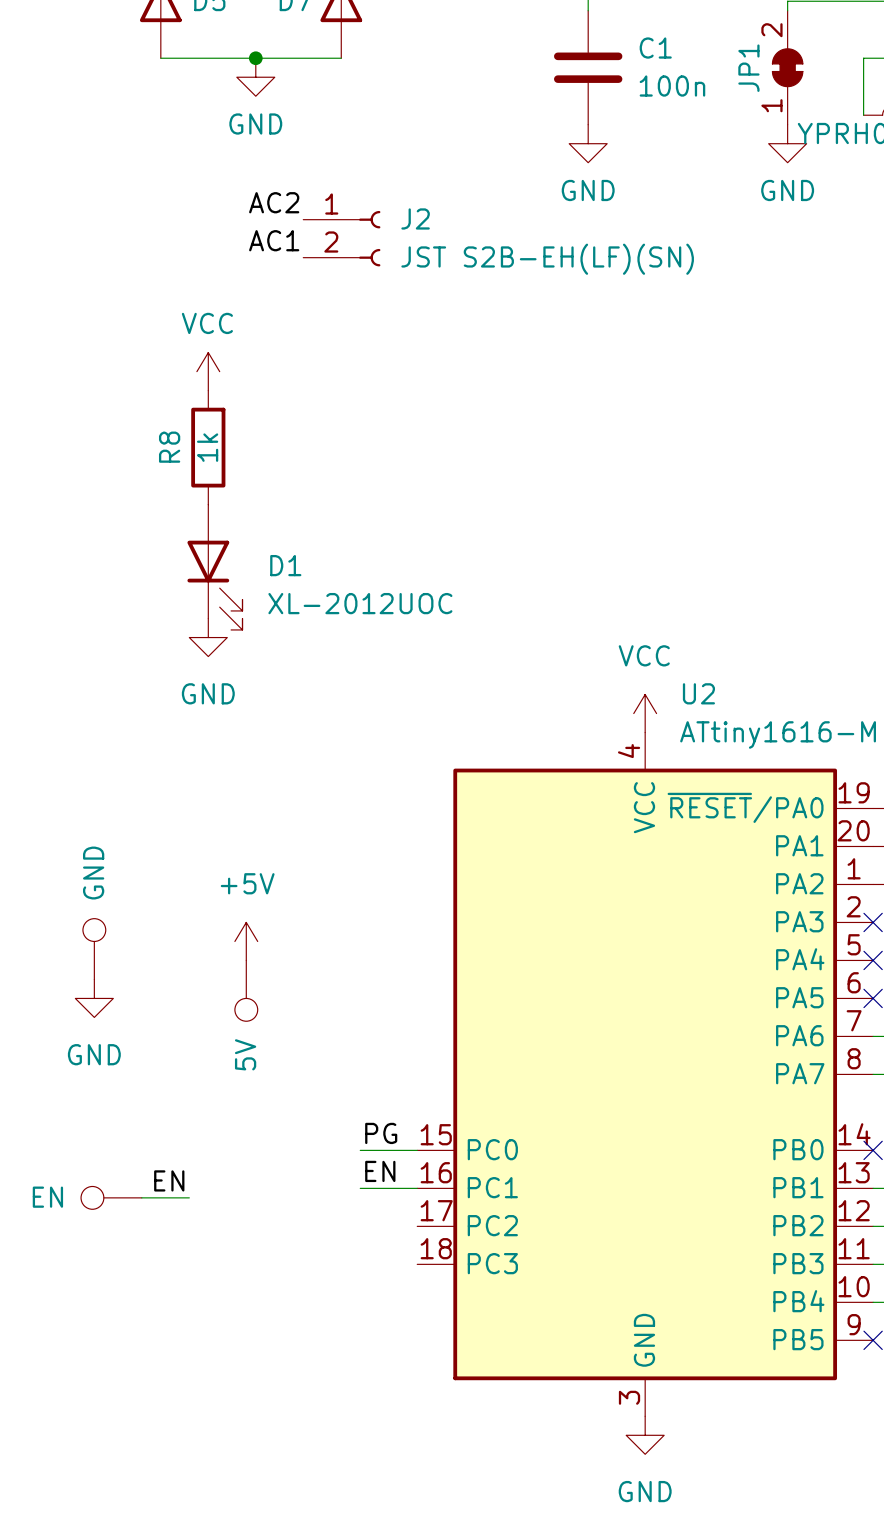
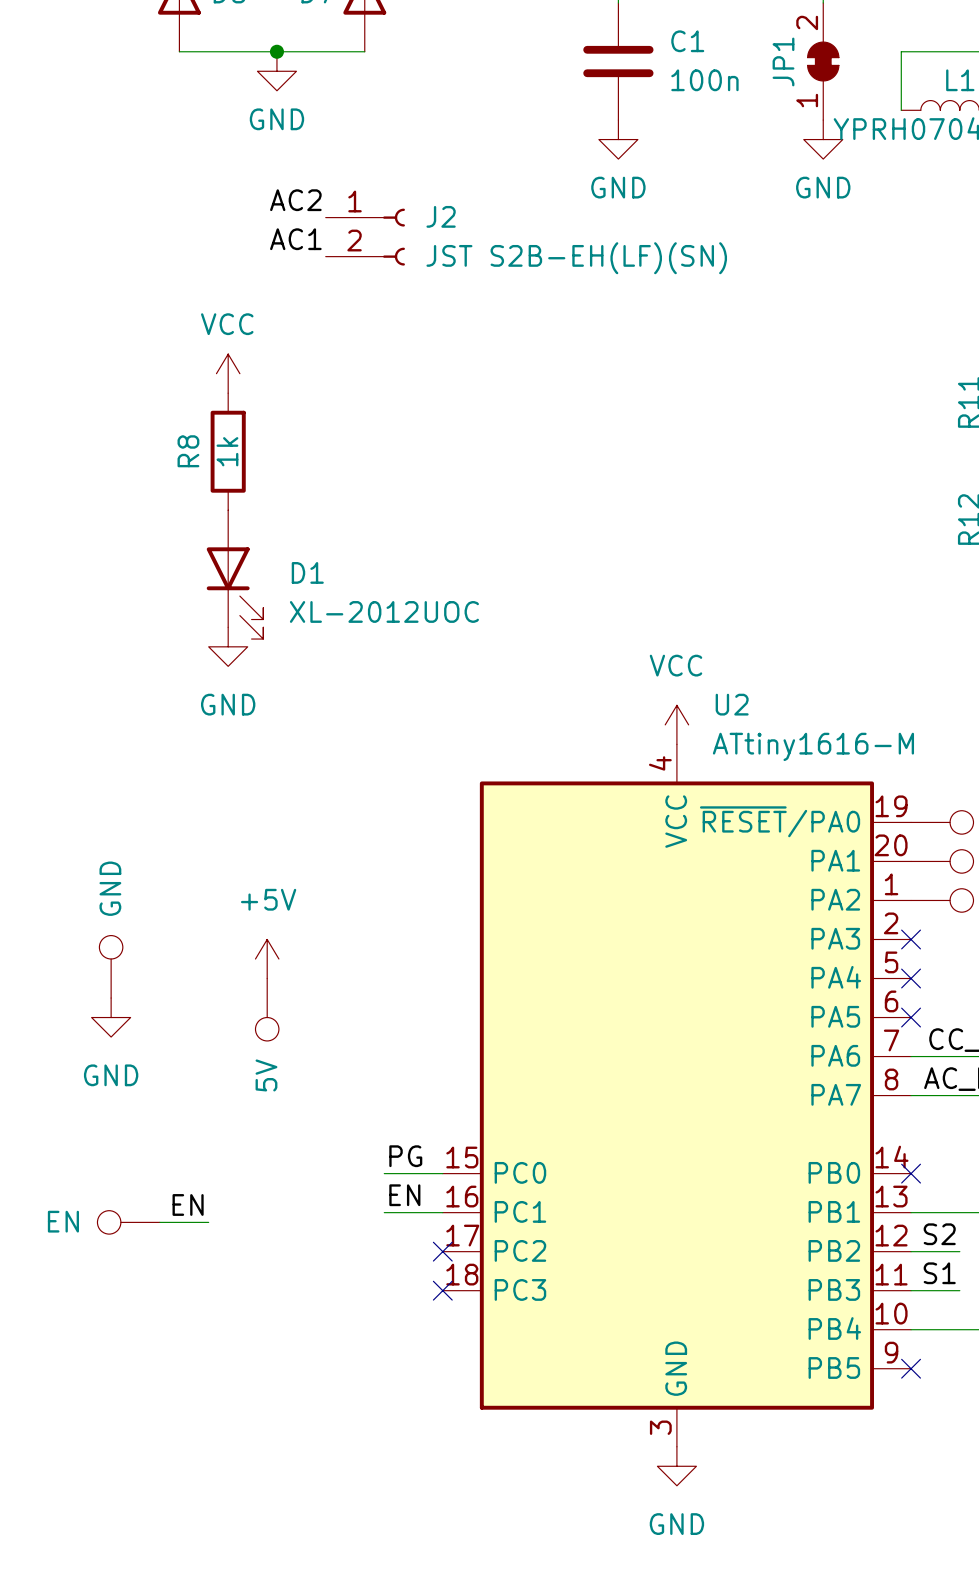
no-connect mark: none -> (442, 1251)
no-connect mark: none -> (442, 1290)

